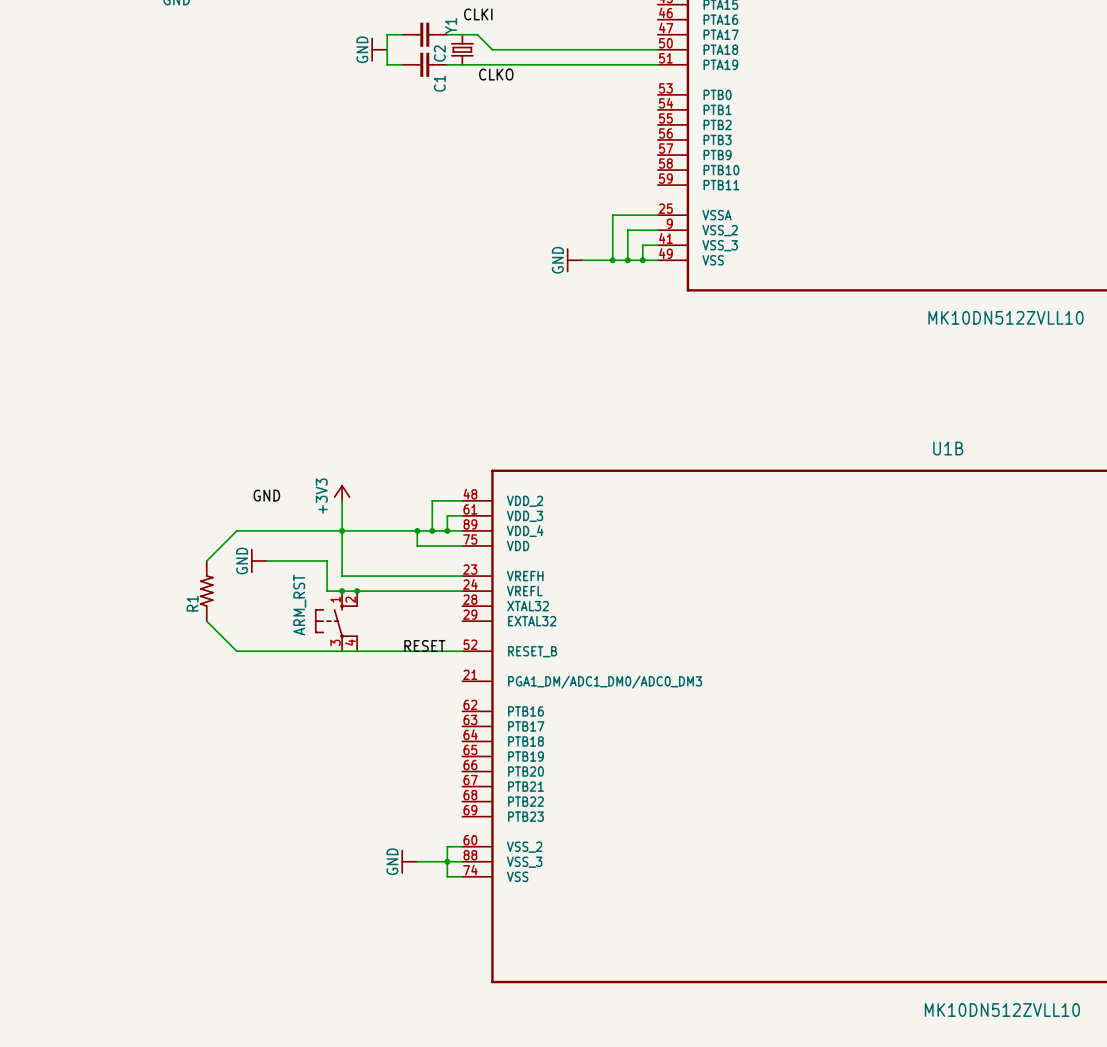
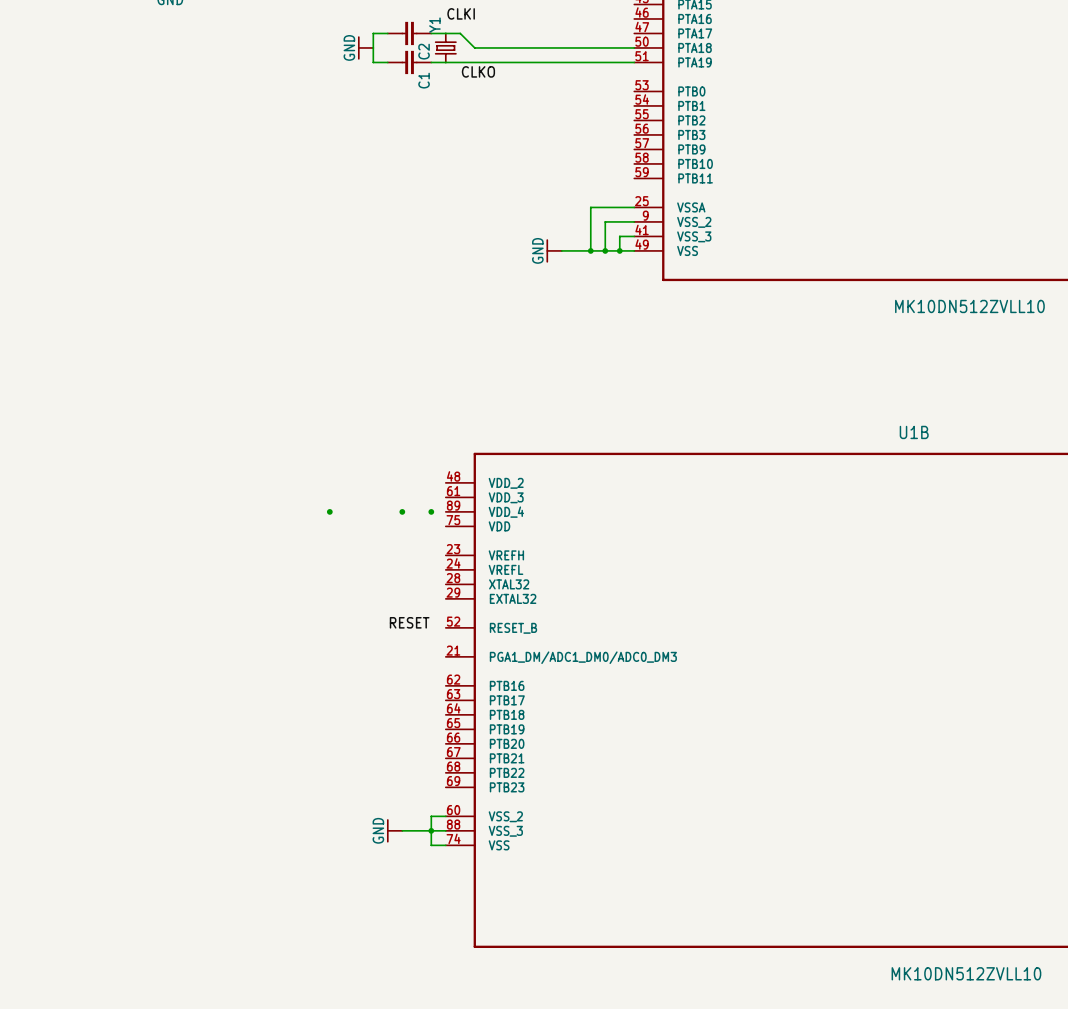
power symbol: +3V3 (342, 492) -> none
label: GND (266, 495) -> none
wire: (342, 500) (342, 576) (462, 576) -> none
wire: (462, 500) (432, 500) (432, 530) -> none
wire: (462, 515) (447, 515) (447, 530) -> none
wire: (417, 530) (417, 545) (462, 545) -> none
junction: (432, 530) -> none
wire: (462, 530) (236, 530) (206, 561) -> none
power symbol: GND (259, 561) -> none
wire: (266, 561) (327, 561) (327, 591) (462, 591) -> none
R1: (206, 591) -> none
junction: (342, 591) -> none
junction: (357, 591) -> none
wire: (206, 621) (236, 651) (462, 651) -> none
ARM_RST: (336, 621) -> none

